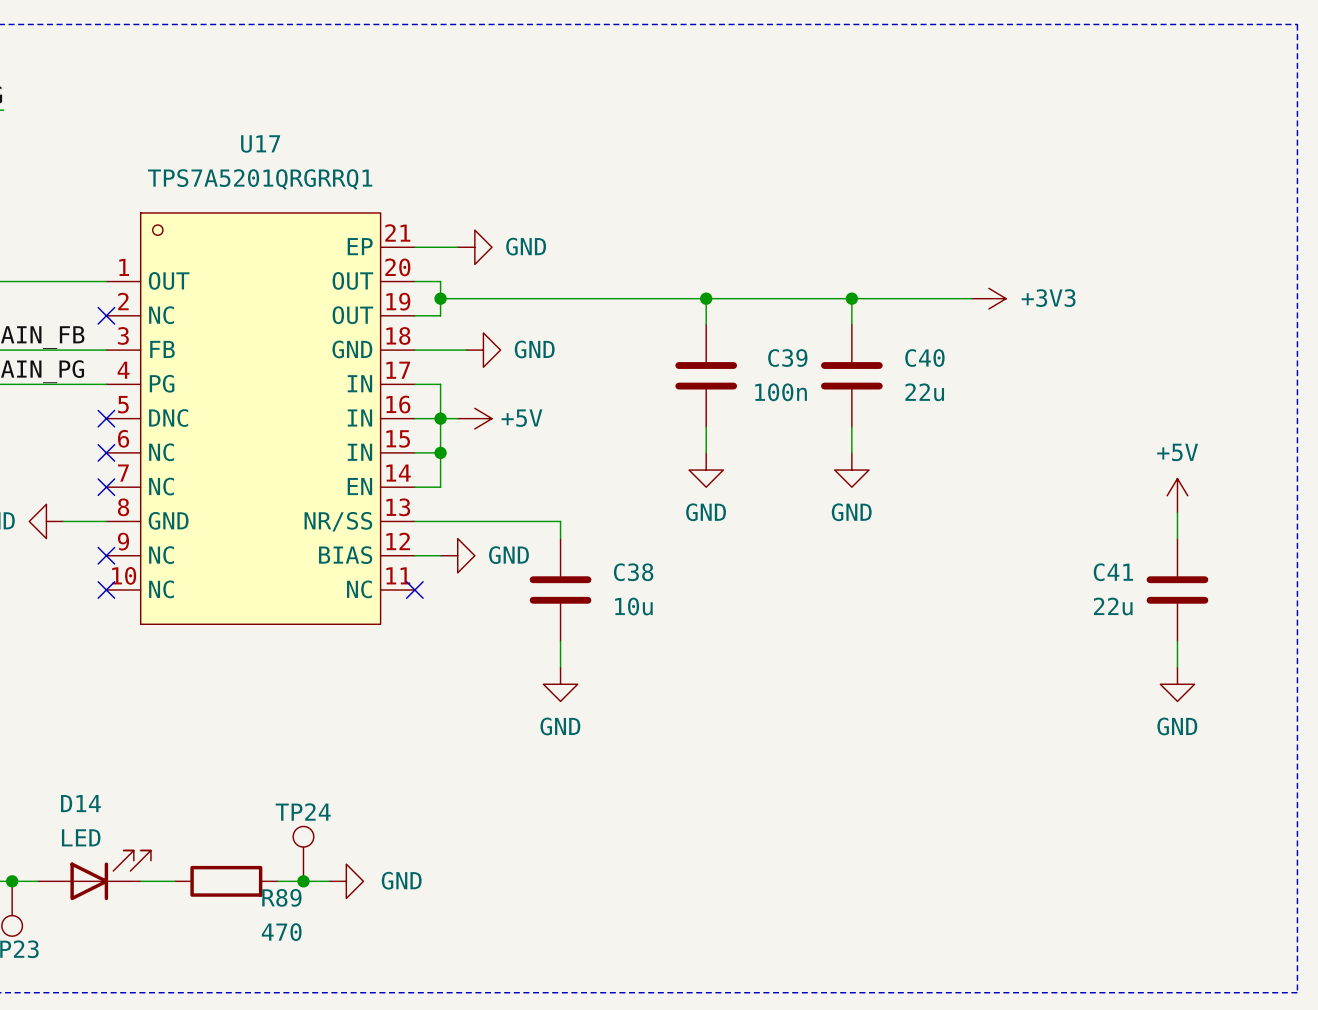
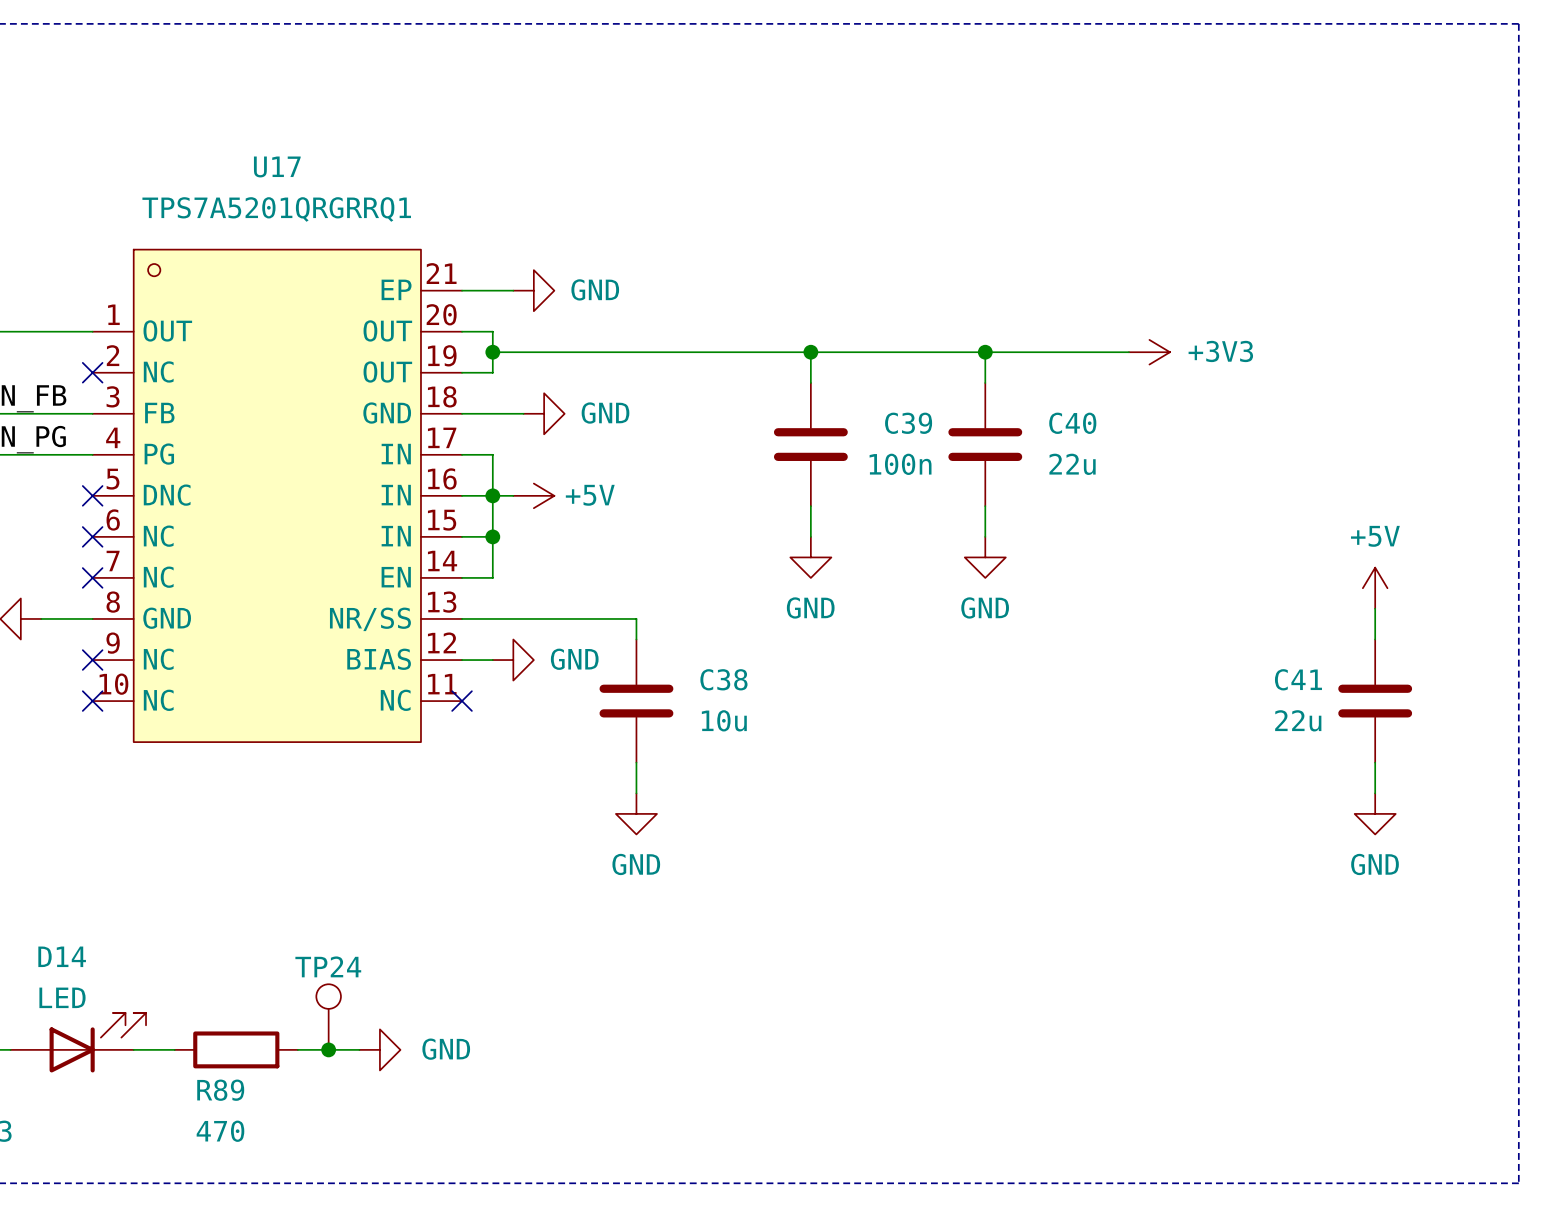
R89 name position: R89 (281, 897) -> R89 (220, 1090)
R89 value position: 470 (281, 932) -> 470 (220, 1131)

